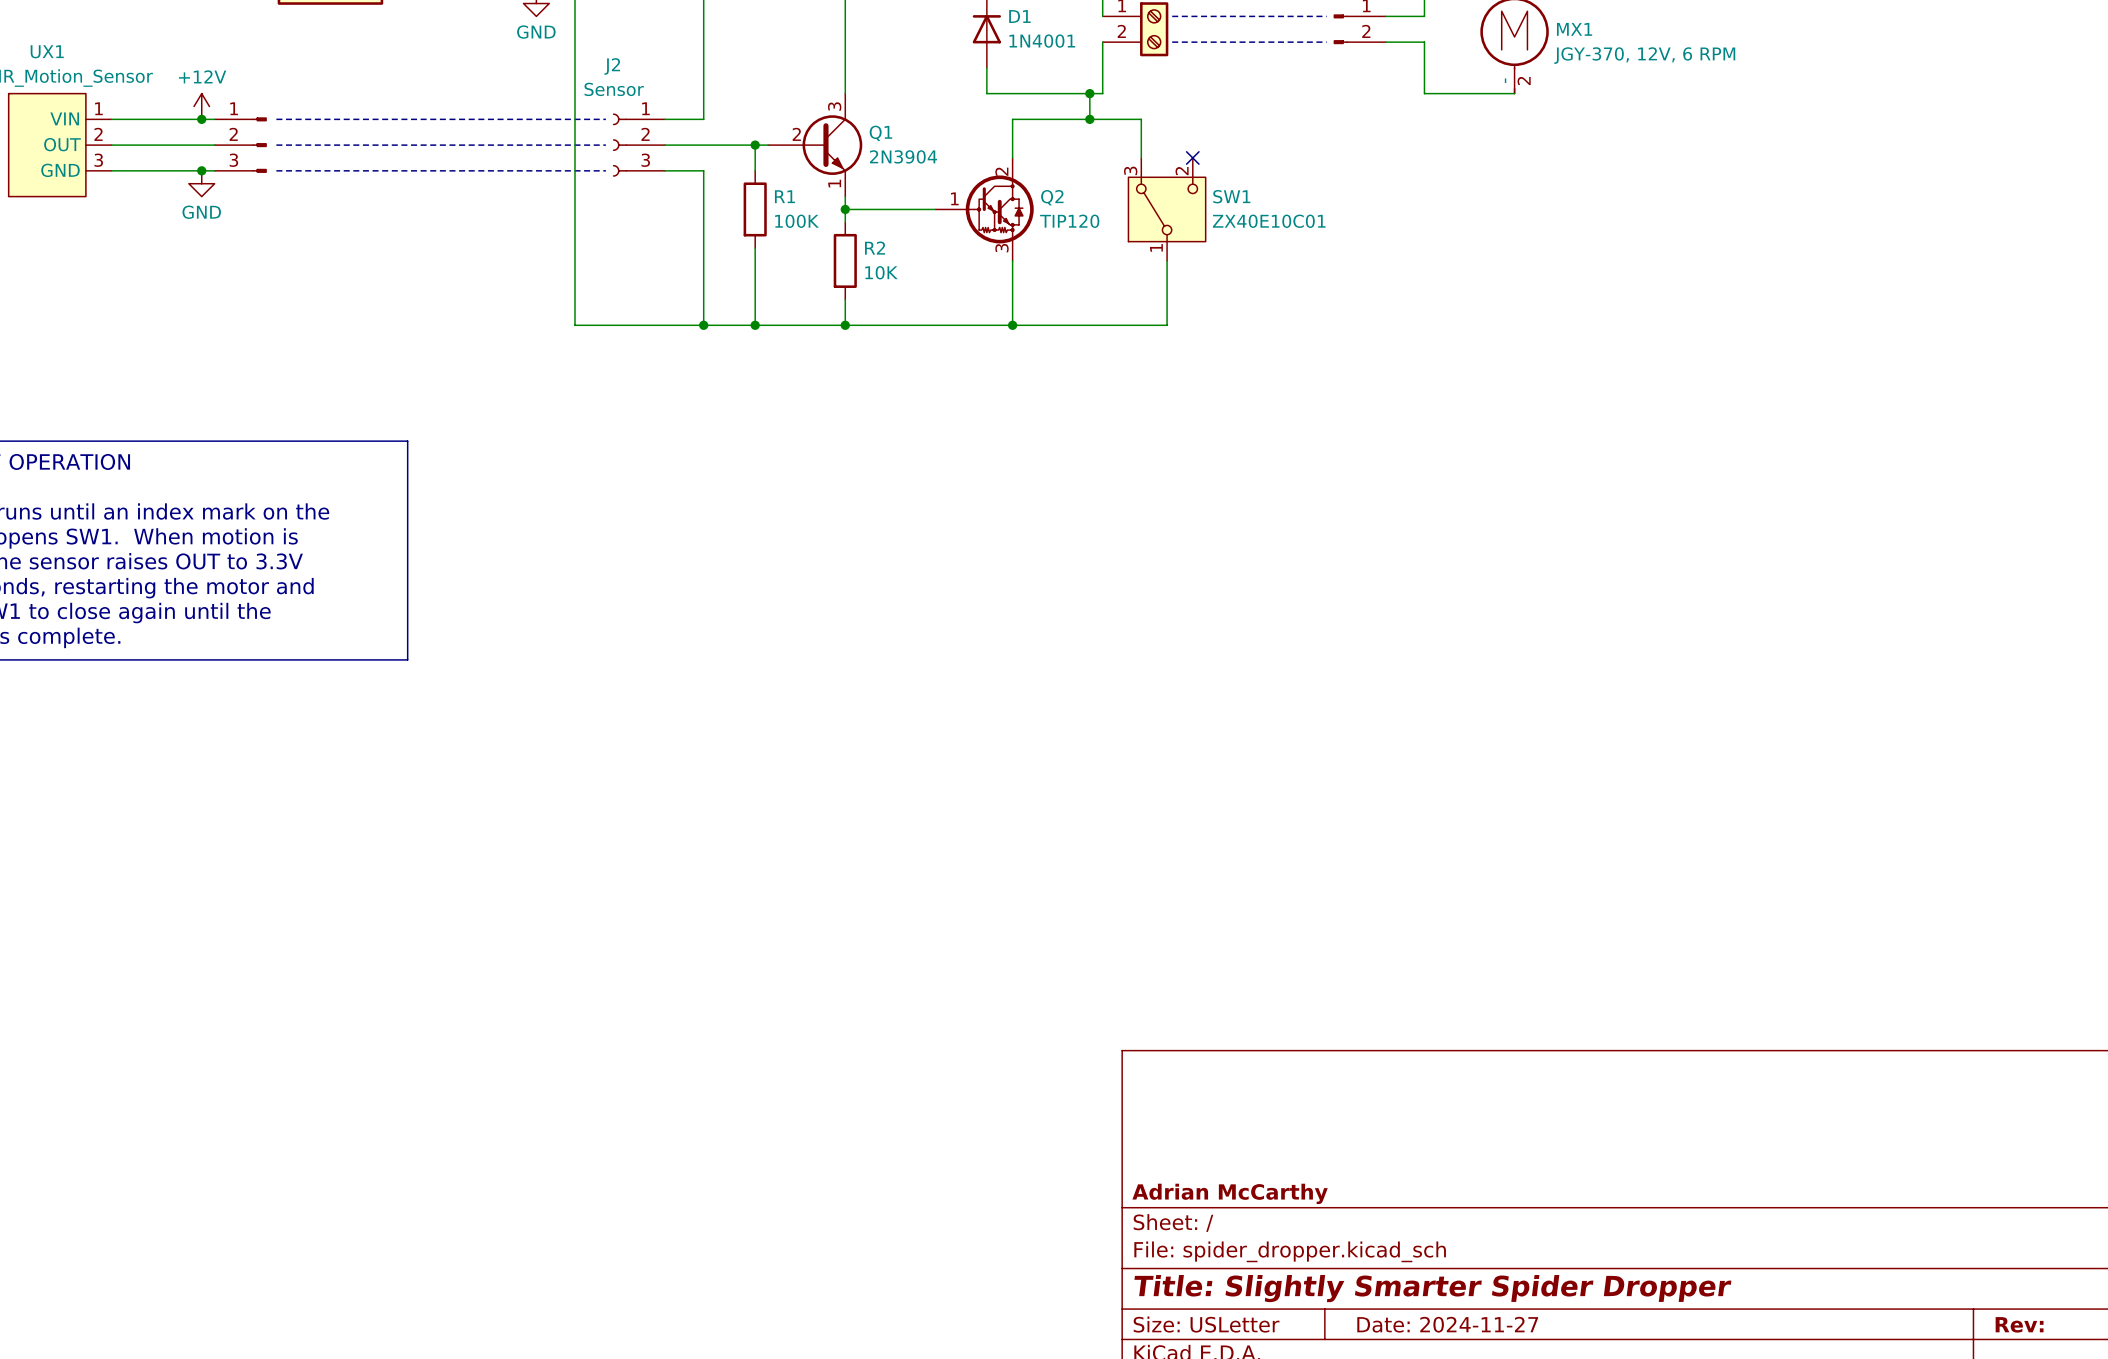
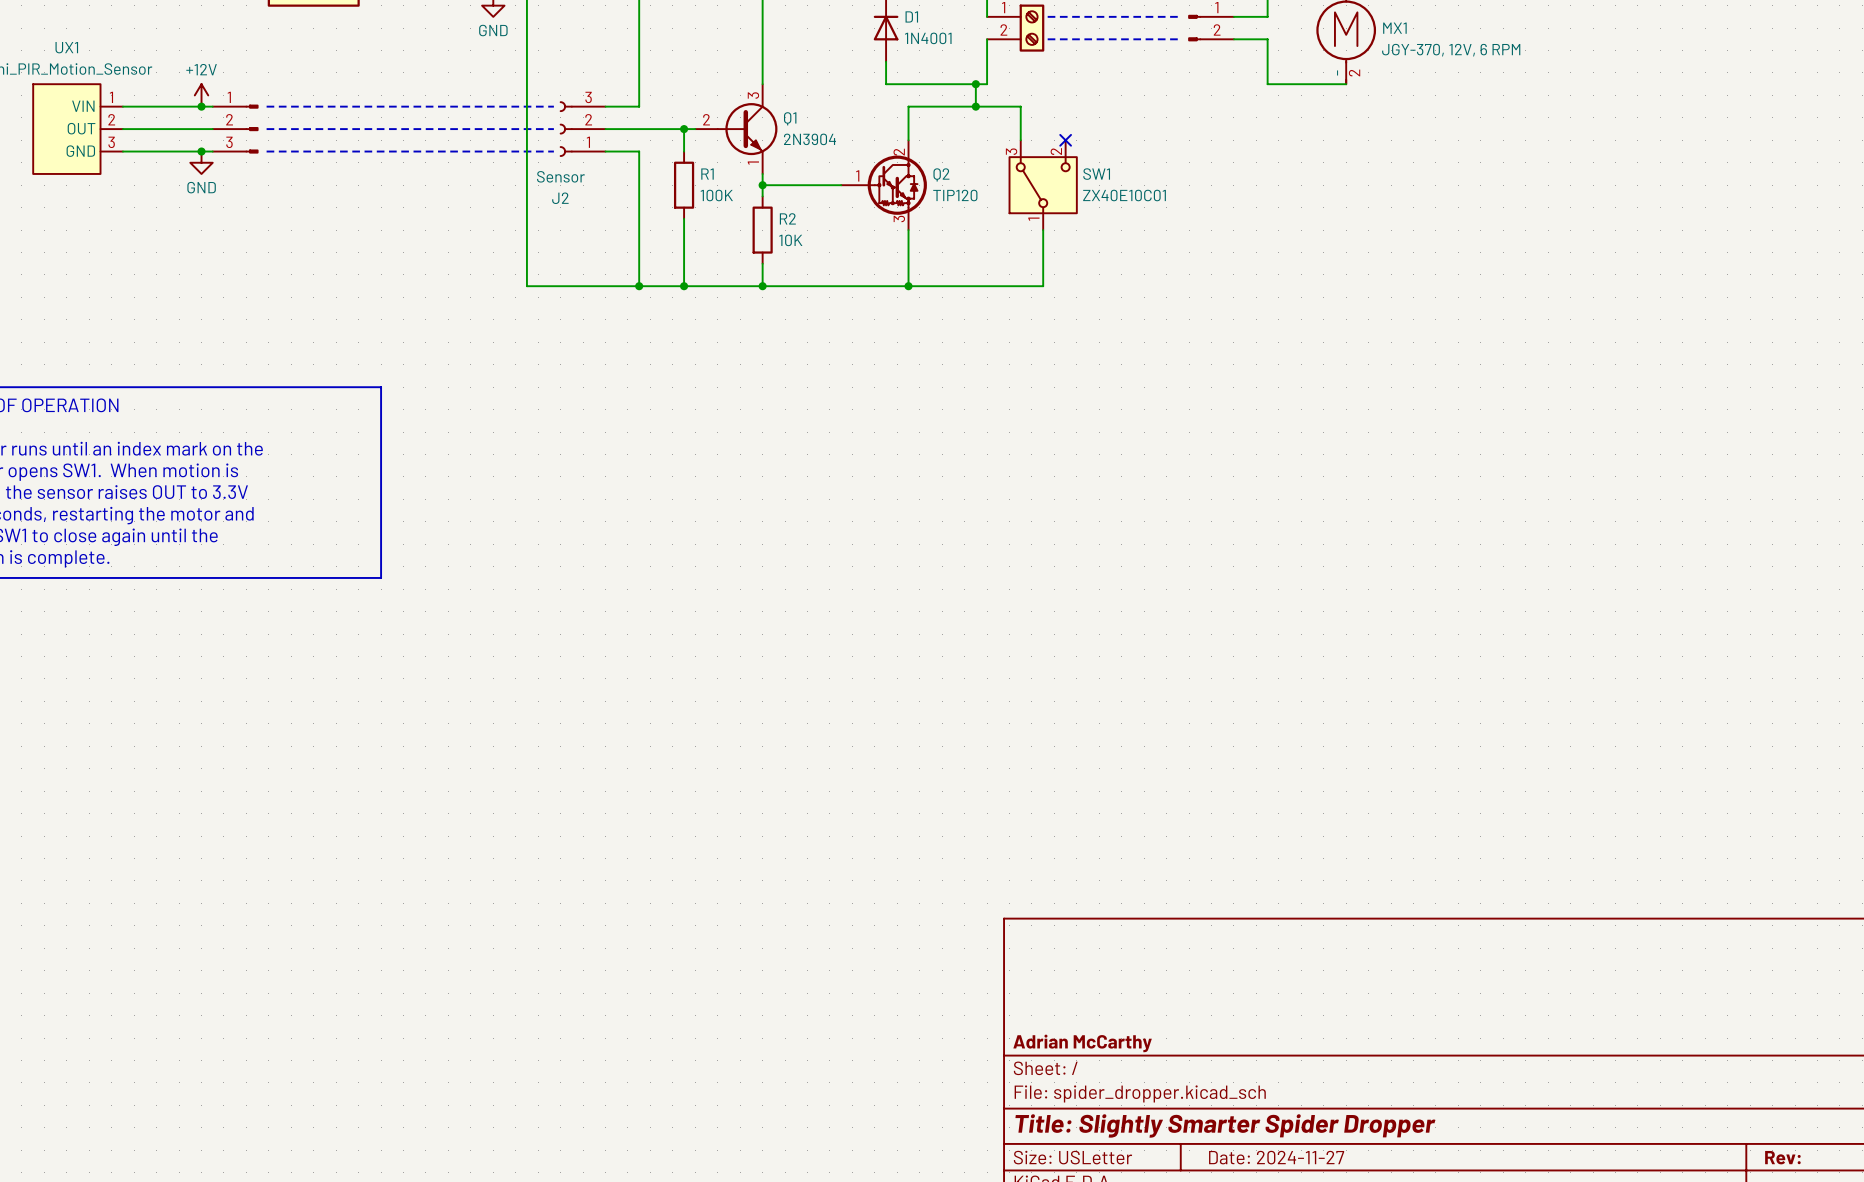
Q1 symbol: [768, 93, 863, 197] -> [695, 84, 778, 174]
J2 flip: as is (620, 145) -> up-down (566, 129)

